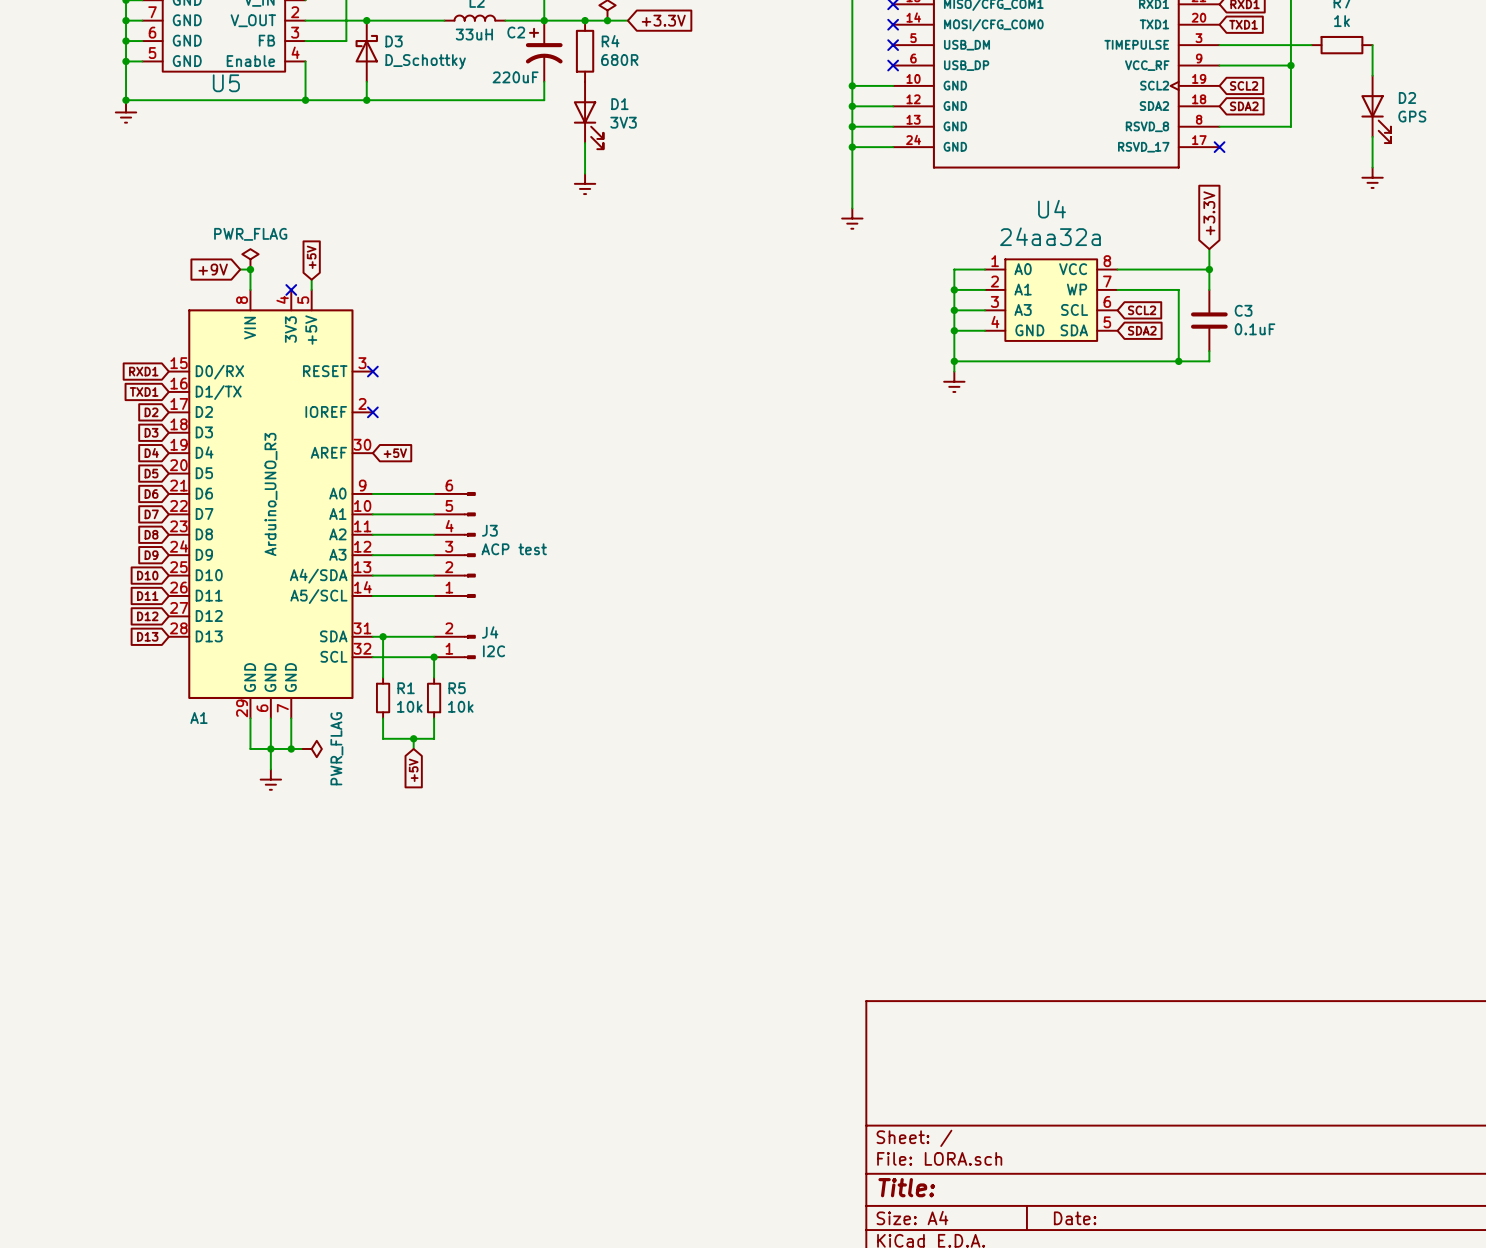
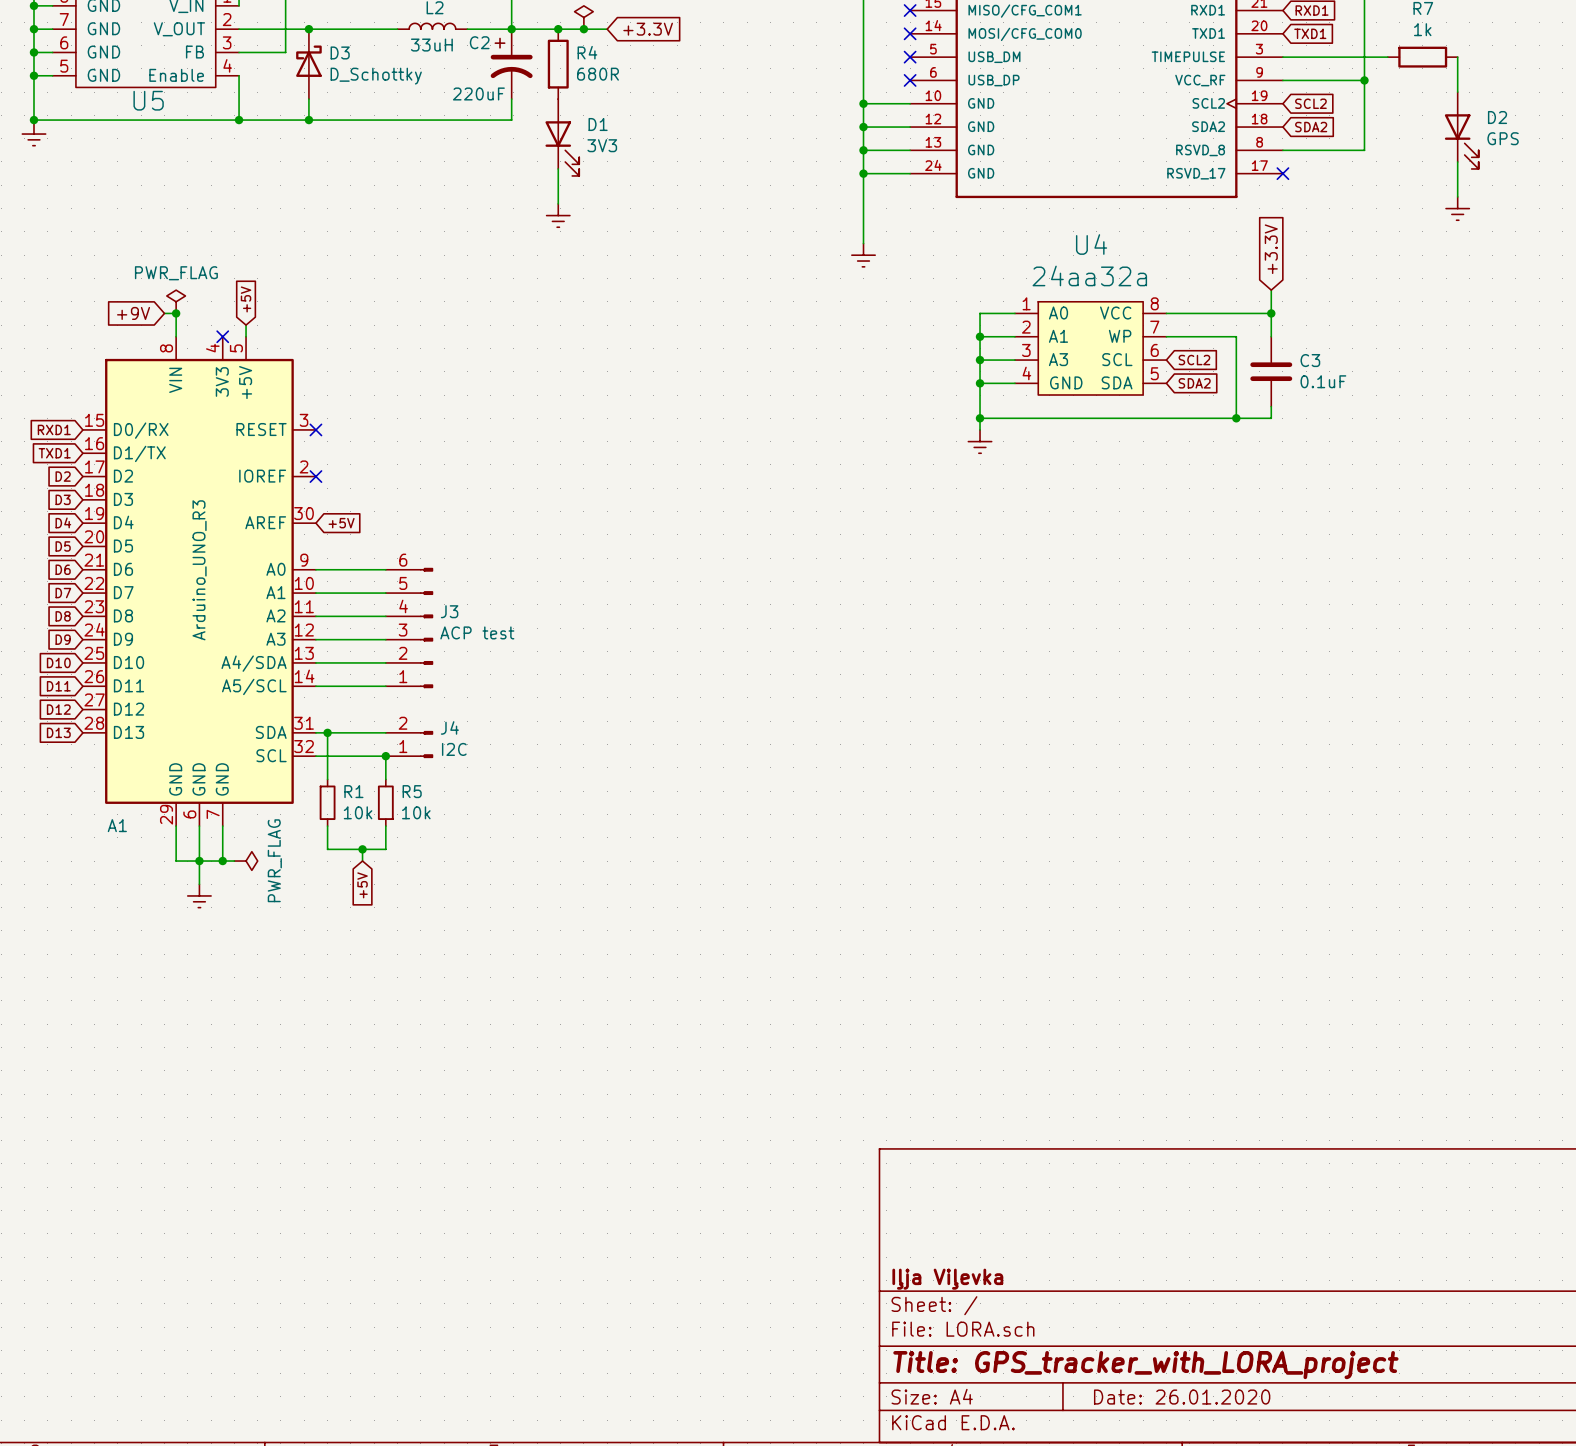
title block: none -> Iļja Viļevka (947, 1279)
title block: Title: (906, 1187) -> Title: GPS_tracker_with_LORA_project (1145, 1365)
title block: Date: (1075, 1218) -> Date: 26.01.2020 (1182, 1397)

